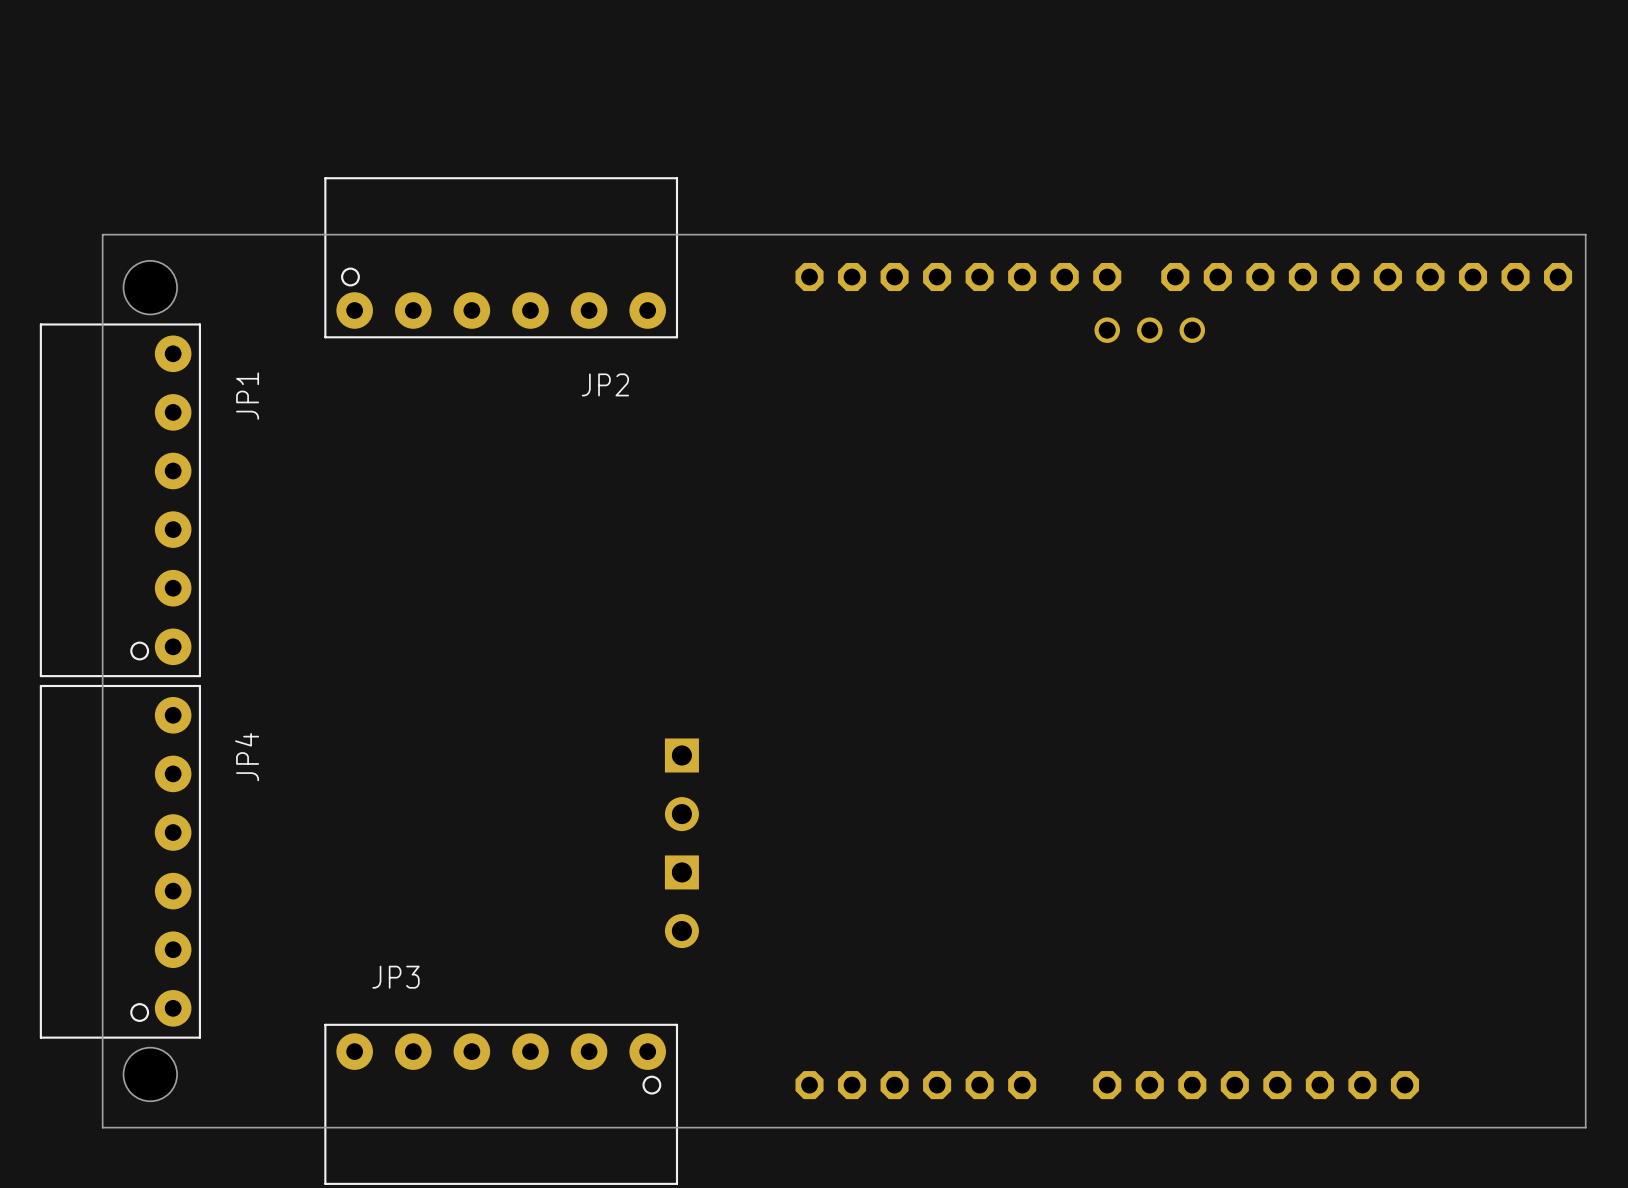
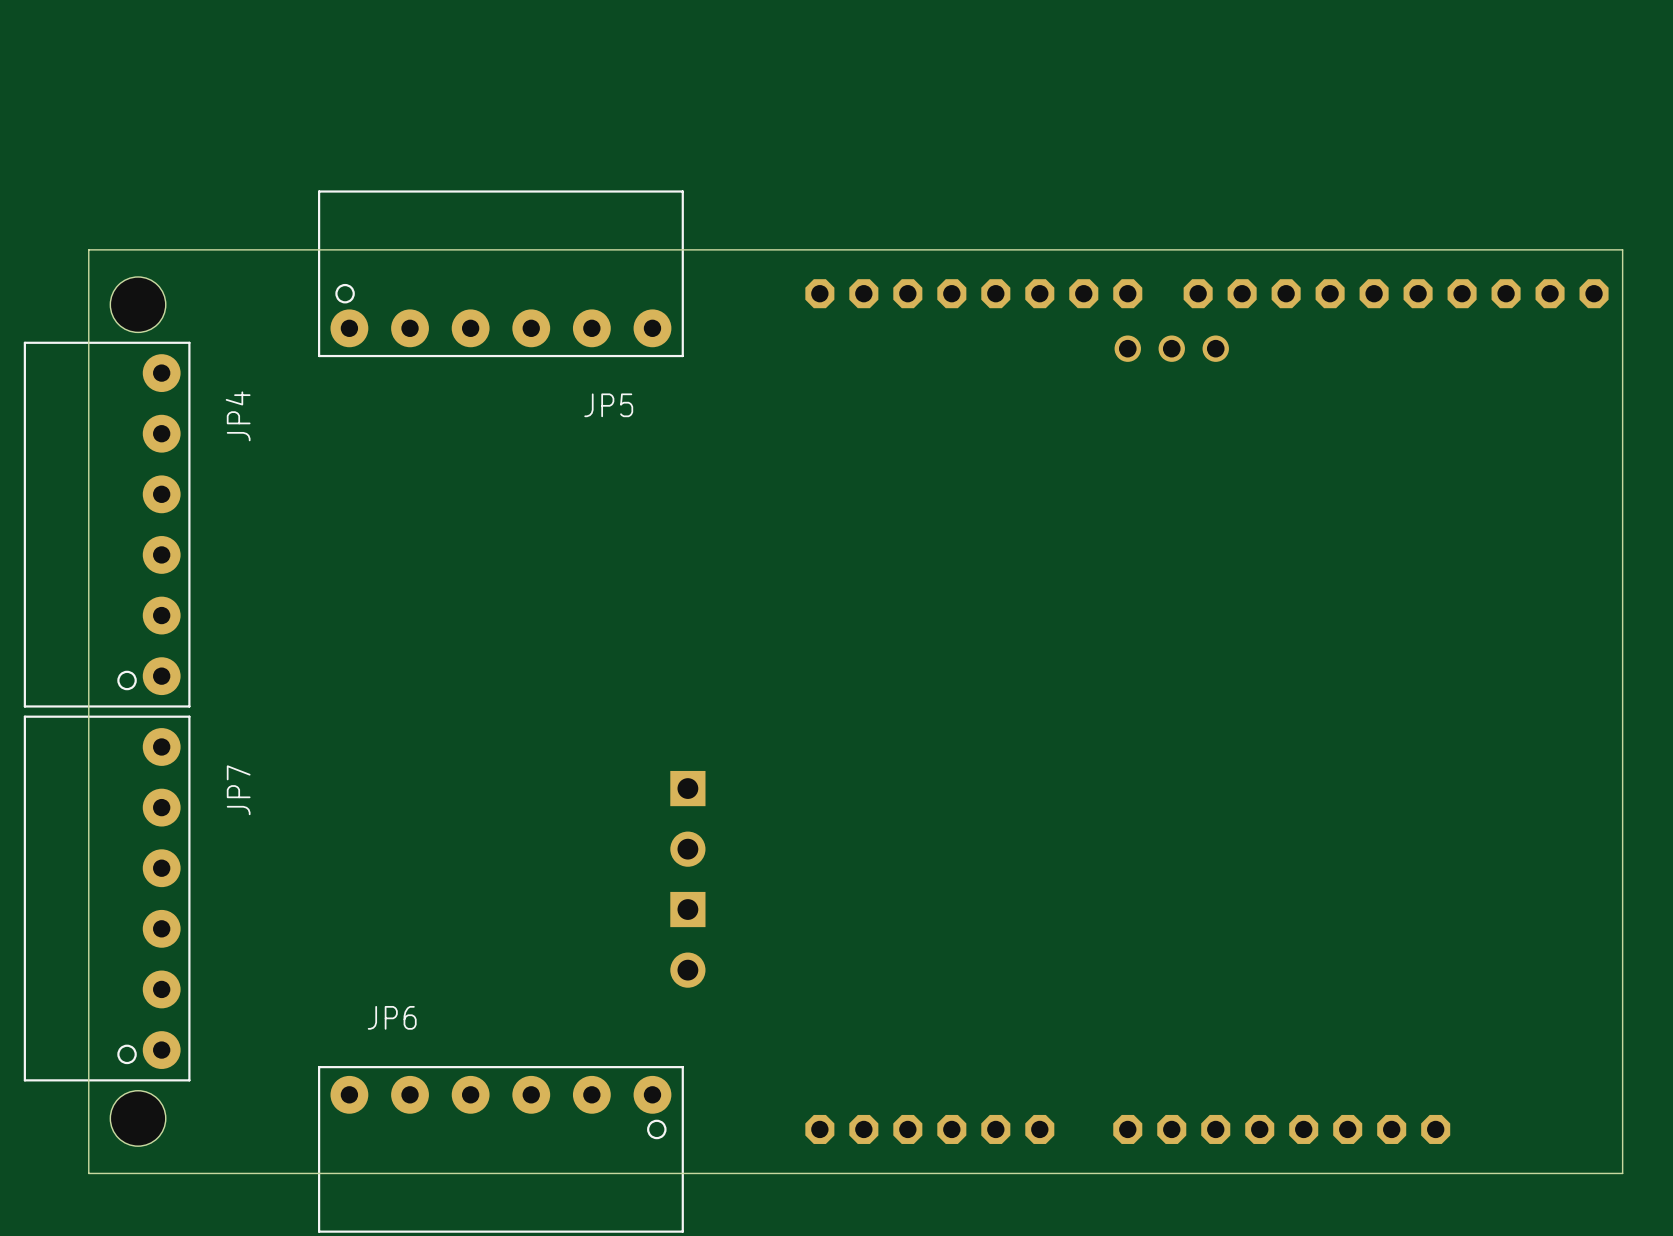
JP2 name: JP2 (605, 384) -> JP5 (608, 405)
JP1 name: JP1 (247, 396) -> JP4 (238, 416)
JP4 name: JP4 (247, 757) -> JP7 (238, 790)
JP3 name: JP3 (396, 977) -> JP6 (392, 1017)

